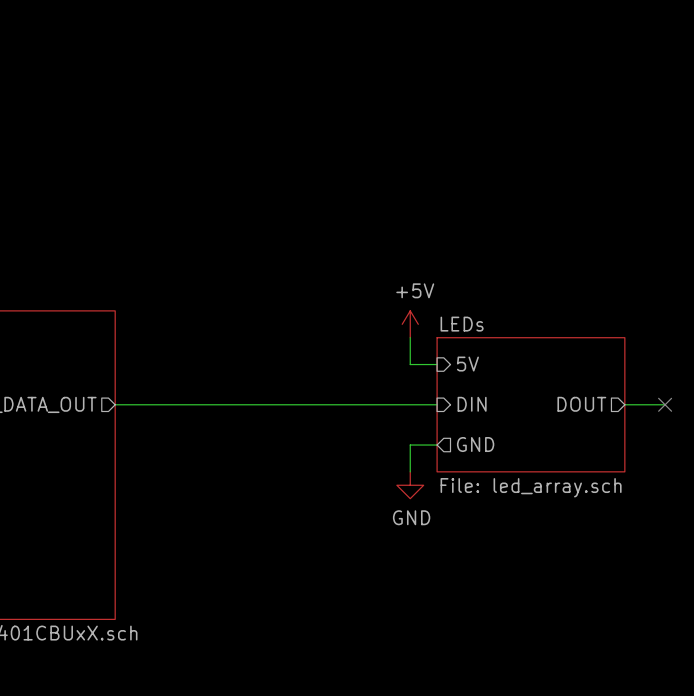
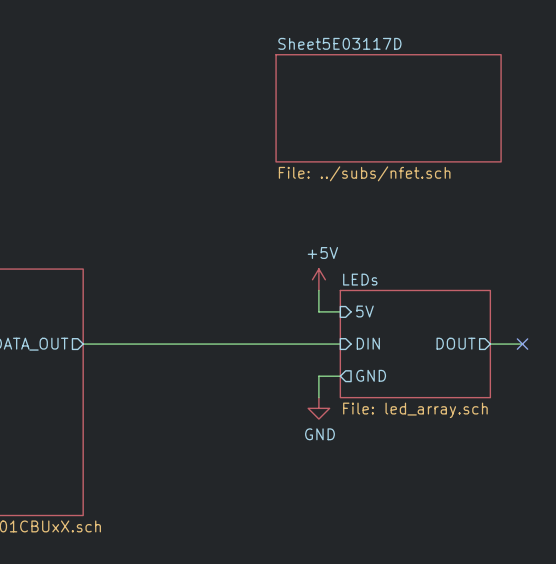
sheet Sheet5E03117D: none -> File: ../subs/nfet.sch (388, 108)

